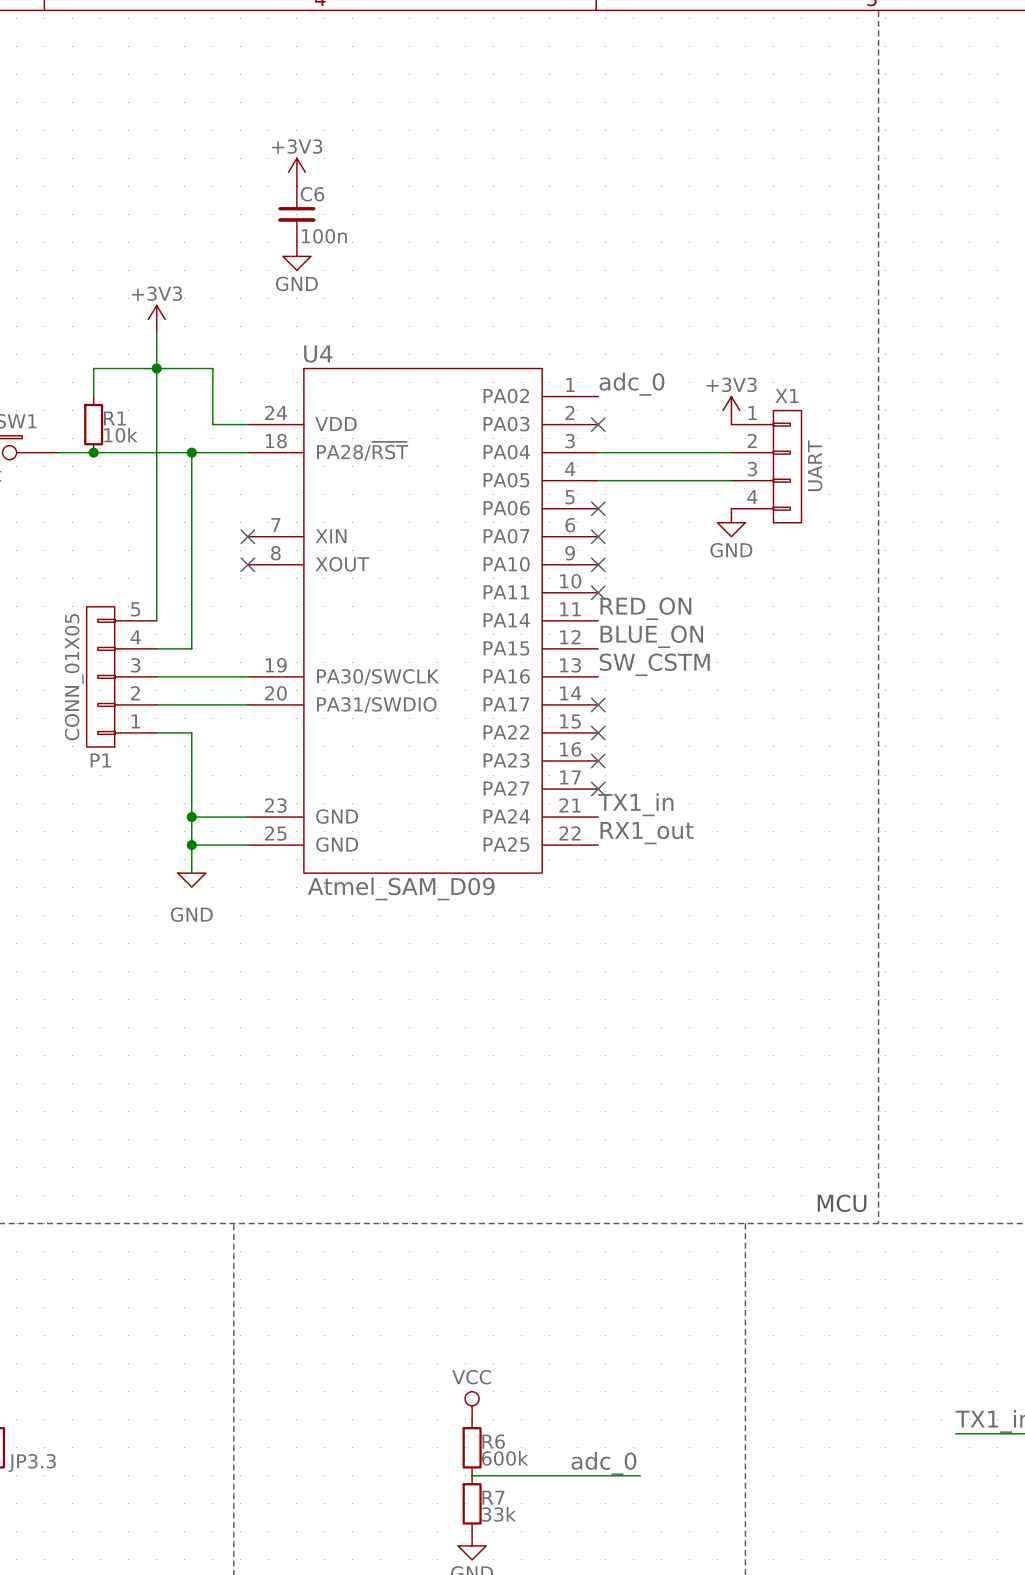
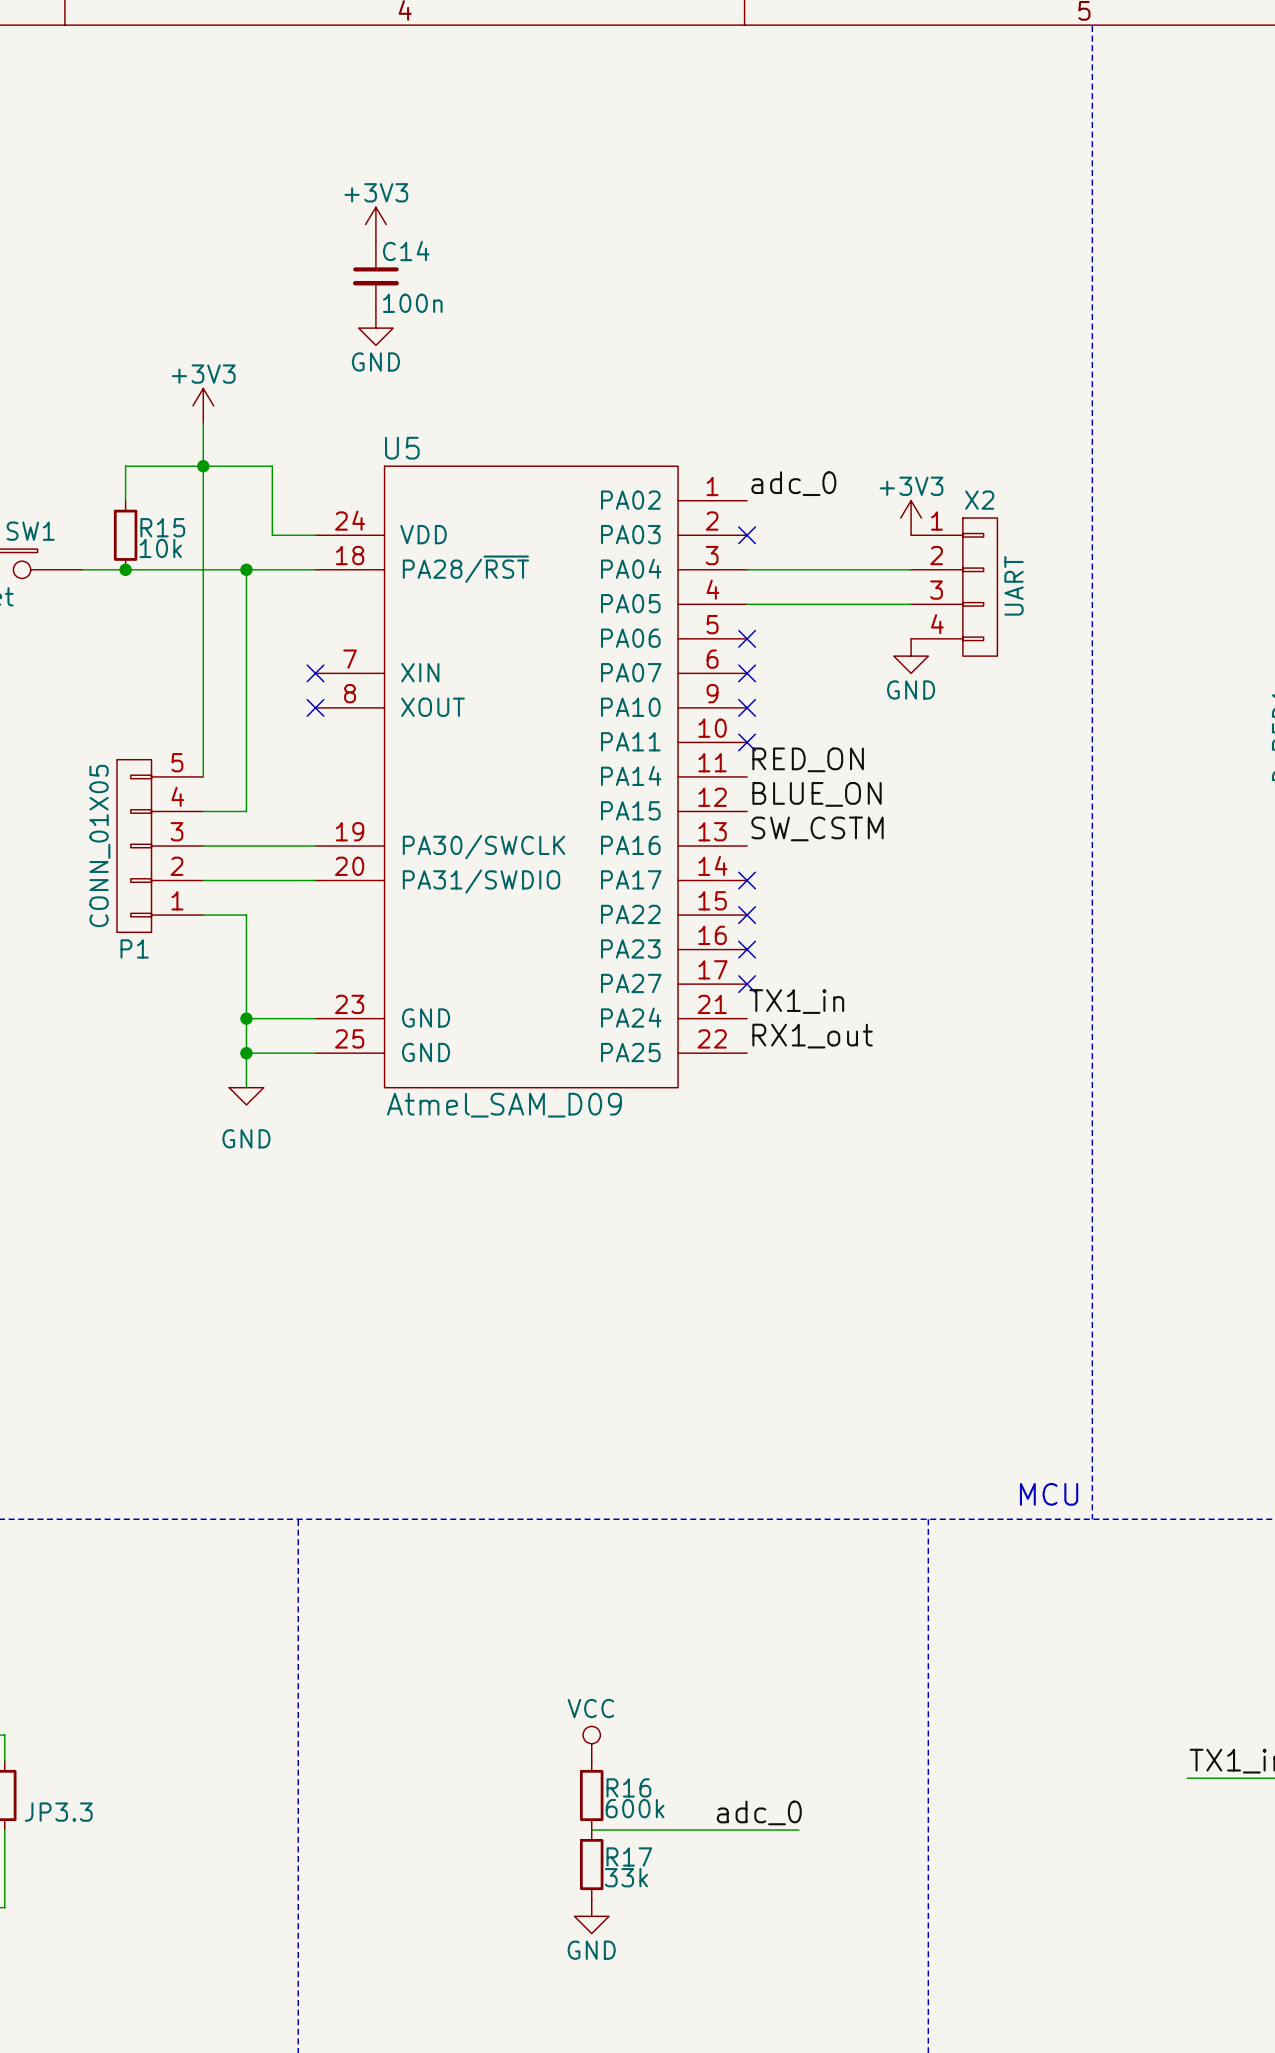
C6 name: C6 (312, 194) -> C14 (406, 251)
U4 name: U4 (318, 354) -> U5 (402, 448)
X1 name: X1 (786, 396) -> X2 (979, 500)
R1 name: R1 (114, 418) -> R15 (162, 527)
R6 name: R6 (493, 1441) -> R16 (628, 1787)
R7 name: R7 (493, 1497) -> R17 (629, 1856)

